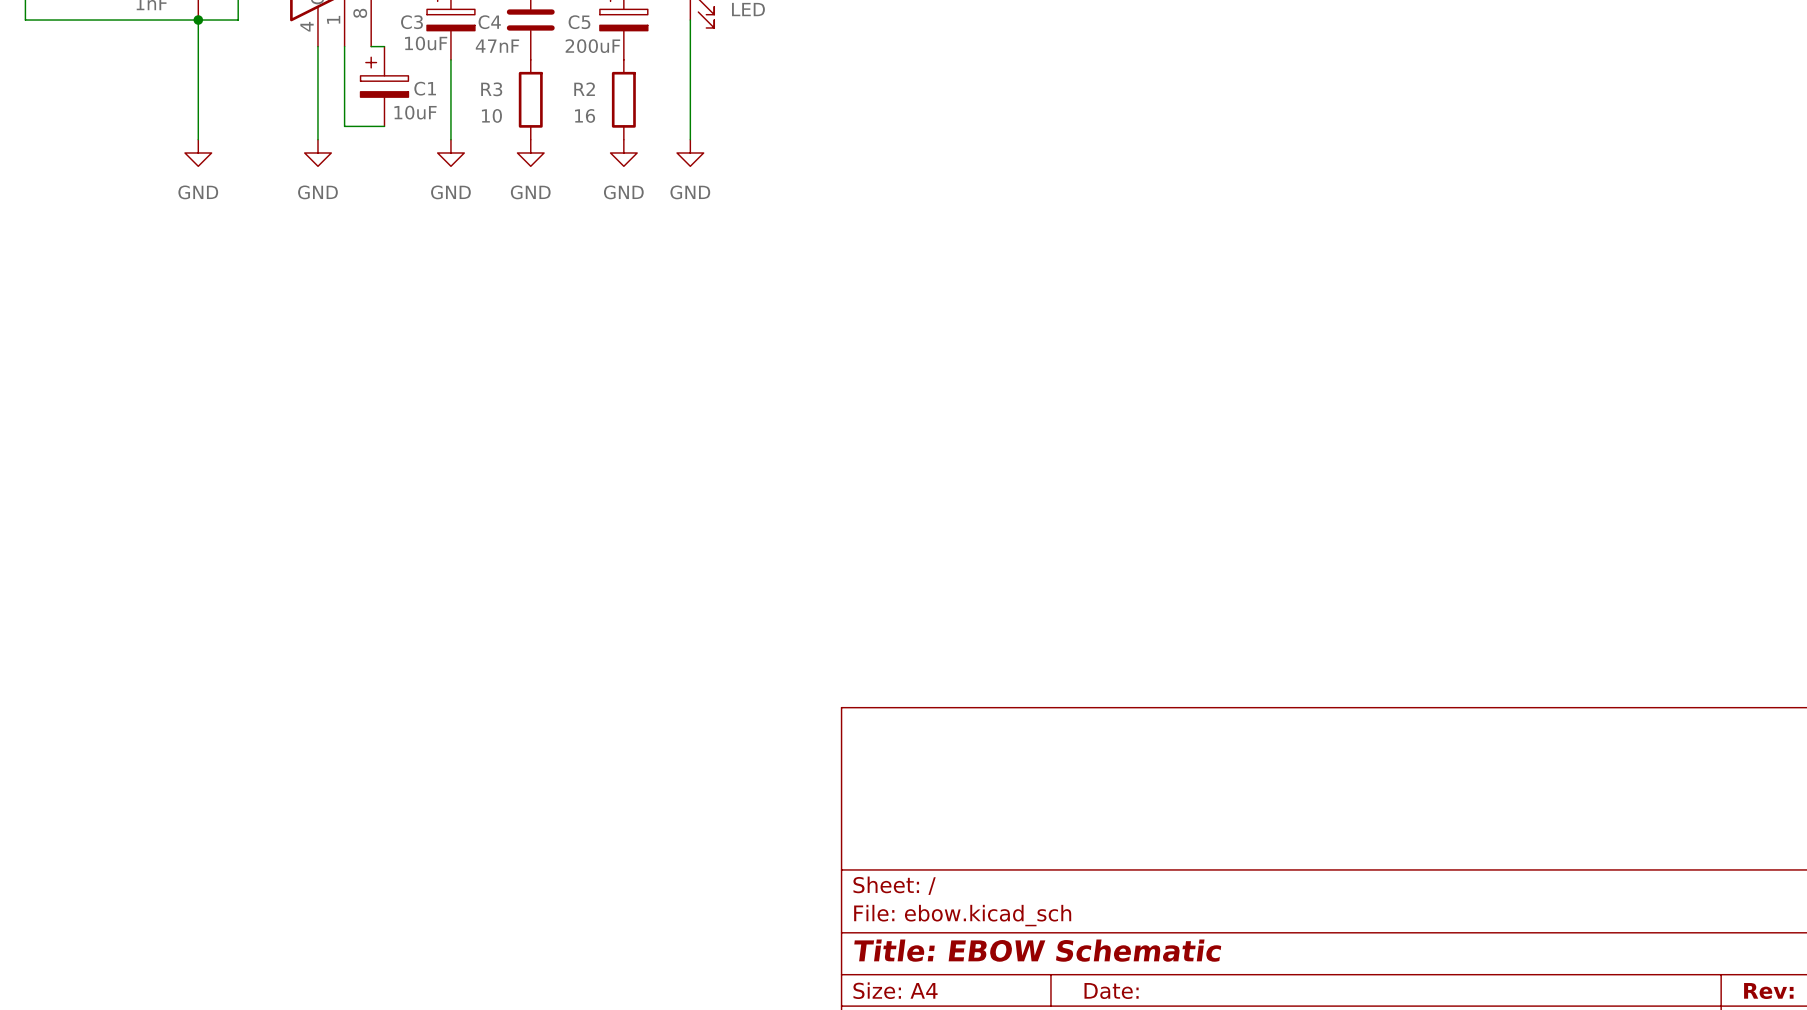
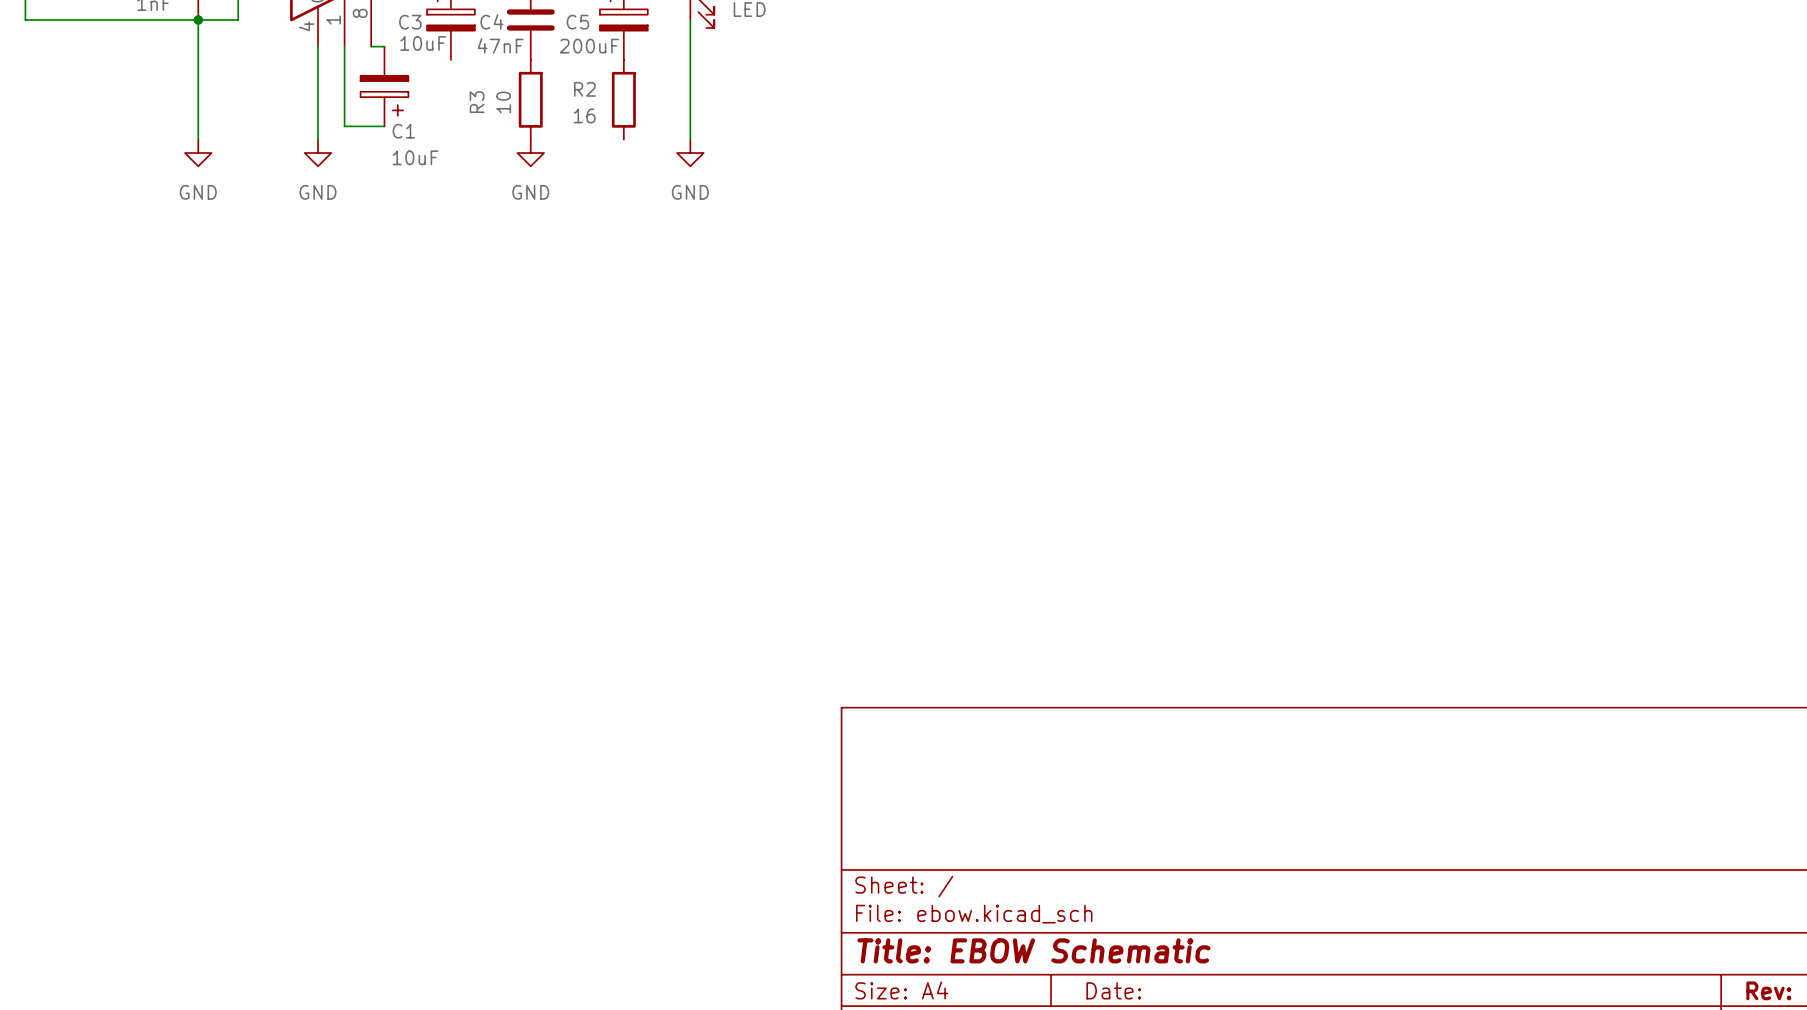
wire: (450, 59) (450, 139) -> none
C1 rotation: 0° (384, 77) -> 180° (384, 95)
C1 name position: C1 (425, 88) -> C1 (403, 131)
R3 name rotation: 0° (491, 89) -> 90° counterclockwise (477, 102)
C1 value position: 10uF (415, 112) -> 10uF (415, 157)
R3 value rotation: 0° (491, 115) -> 90° counterclockwise (503, 102)
power symbol: GND (450, 153) -> none
power symbol: GND (623, 153) -> none

